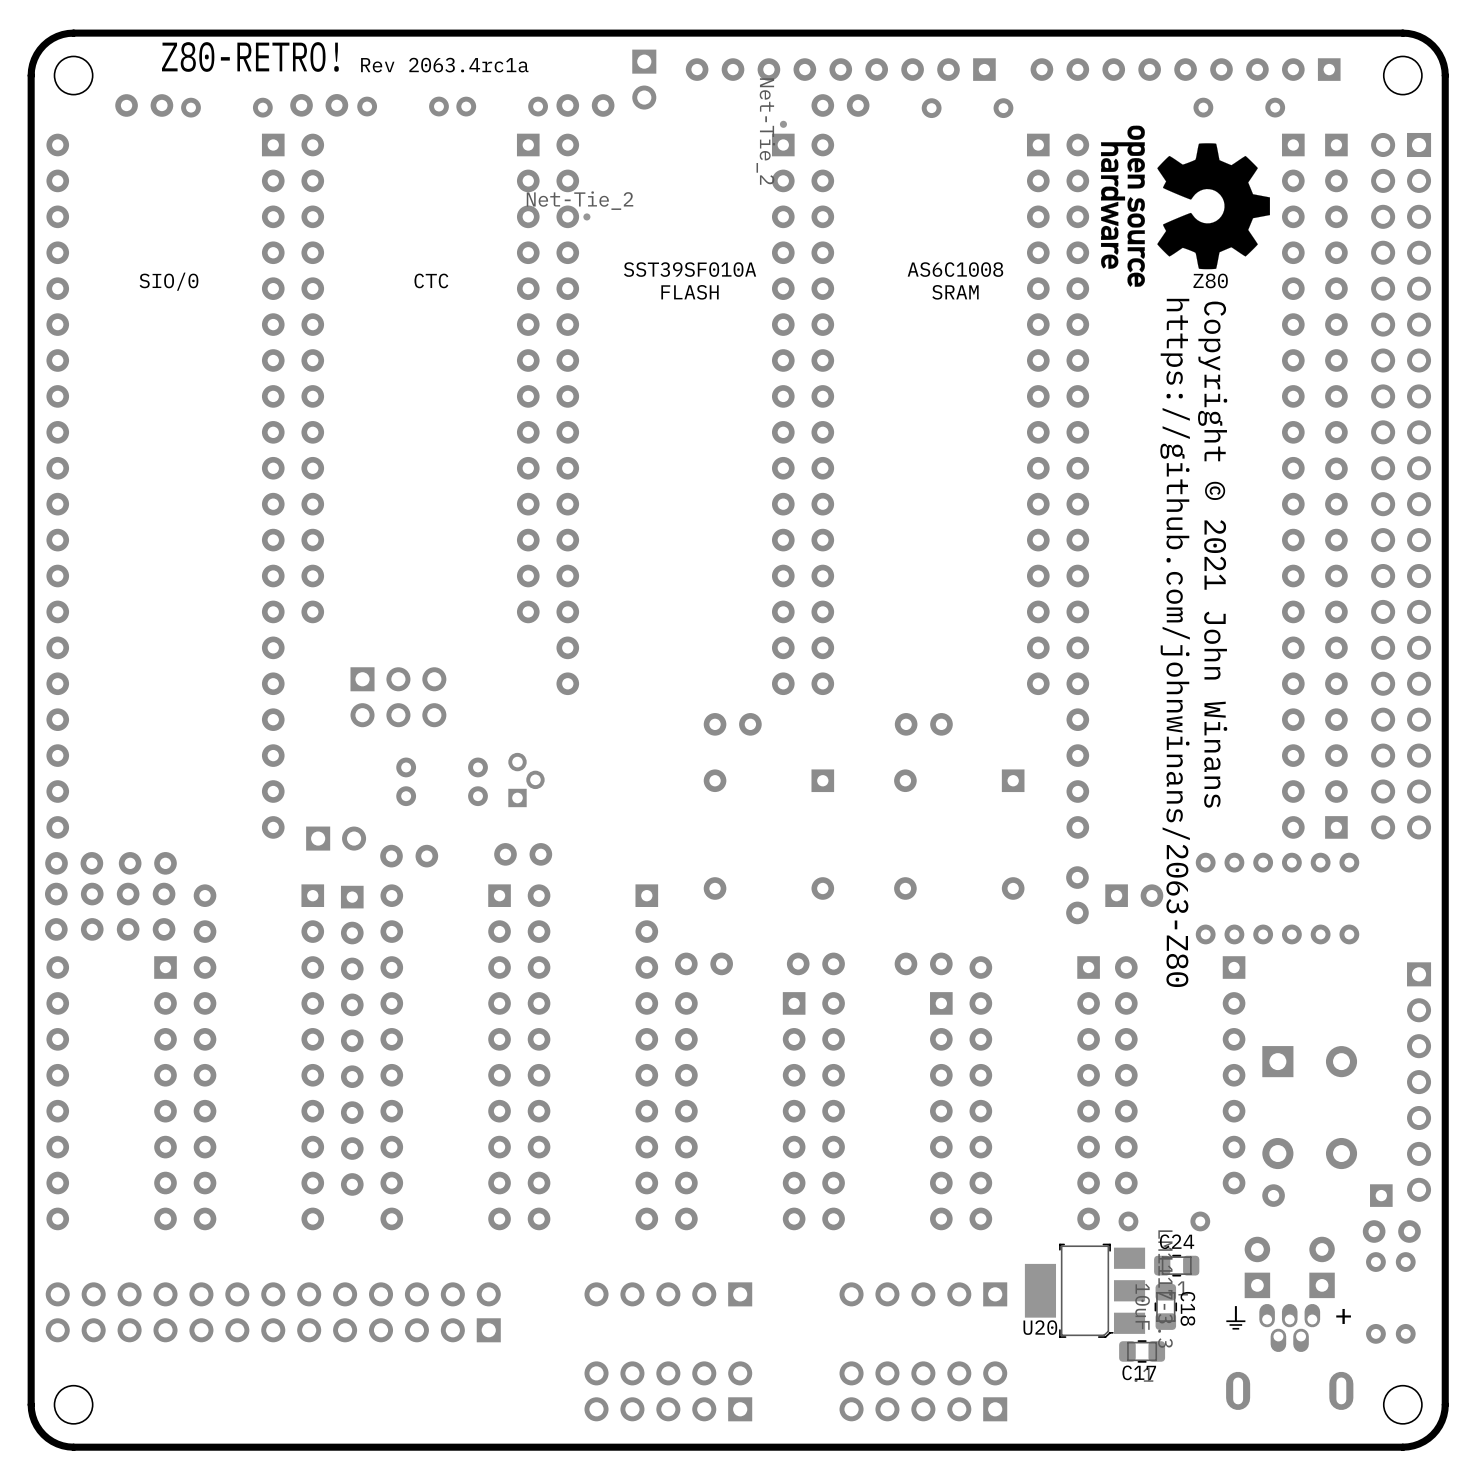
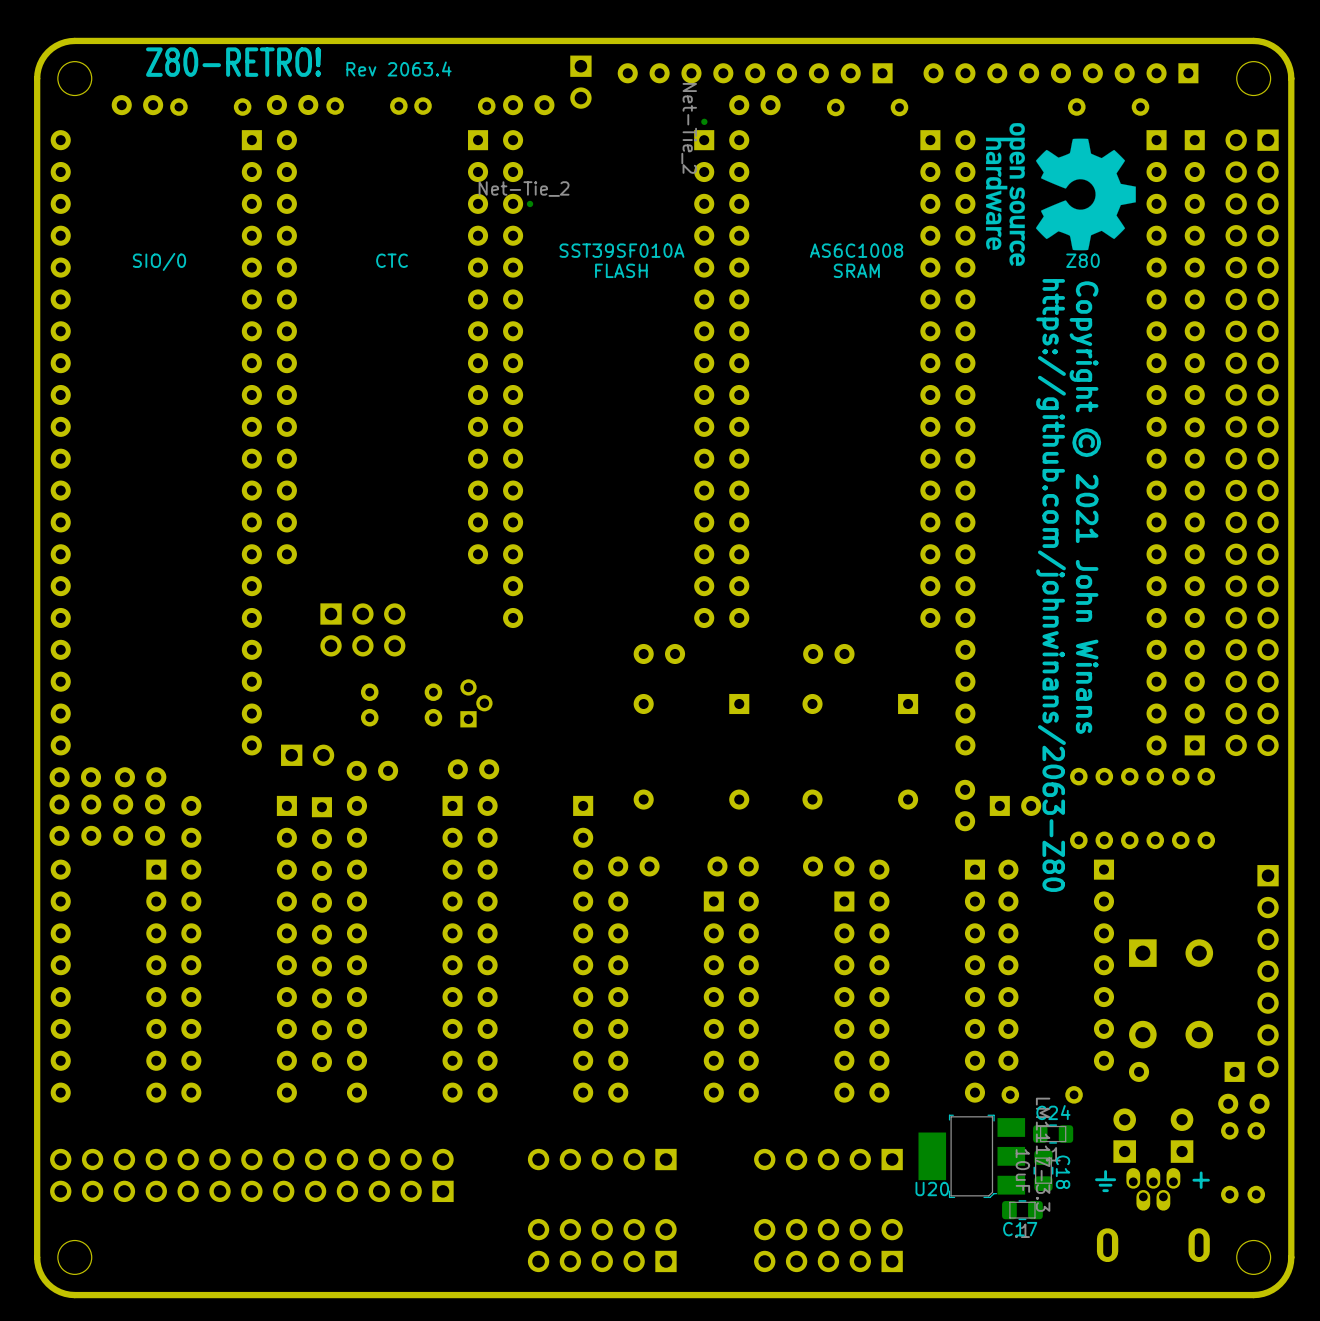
text: Rev 2063.4rc1a (444, 65) -> Rev 2063.4 (399, 68)

